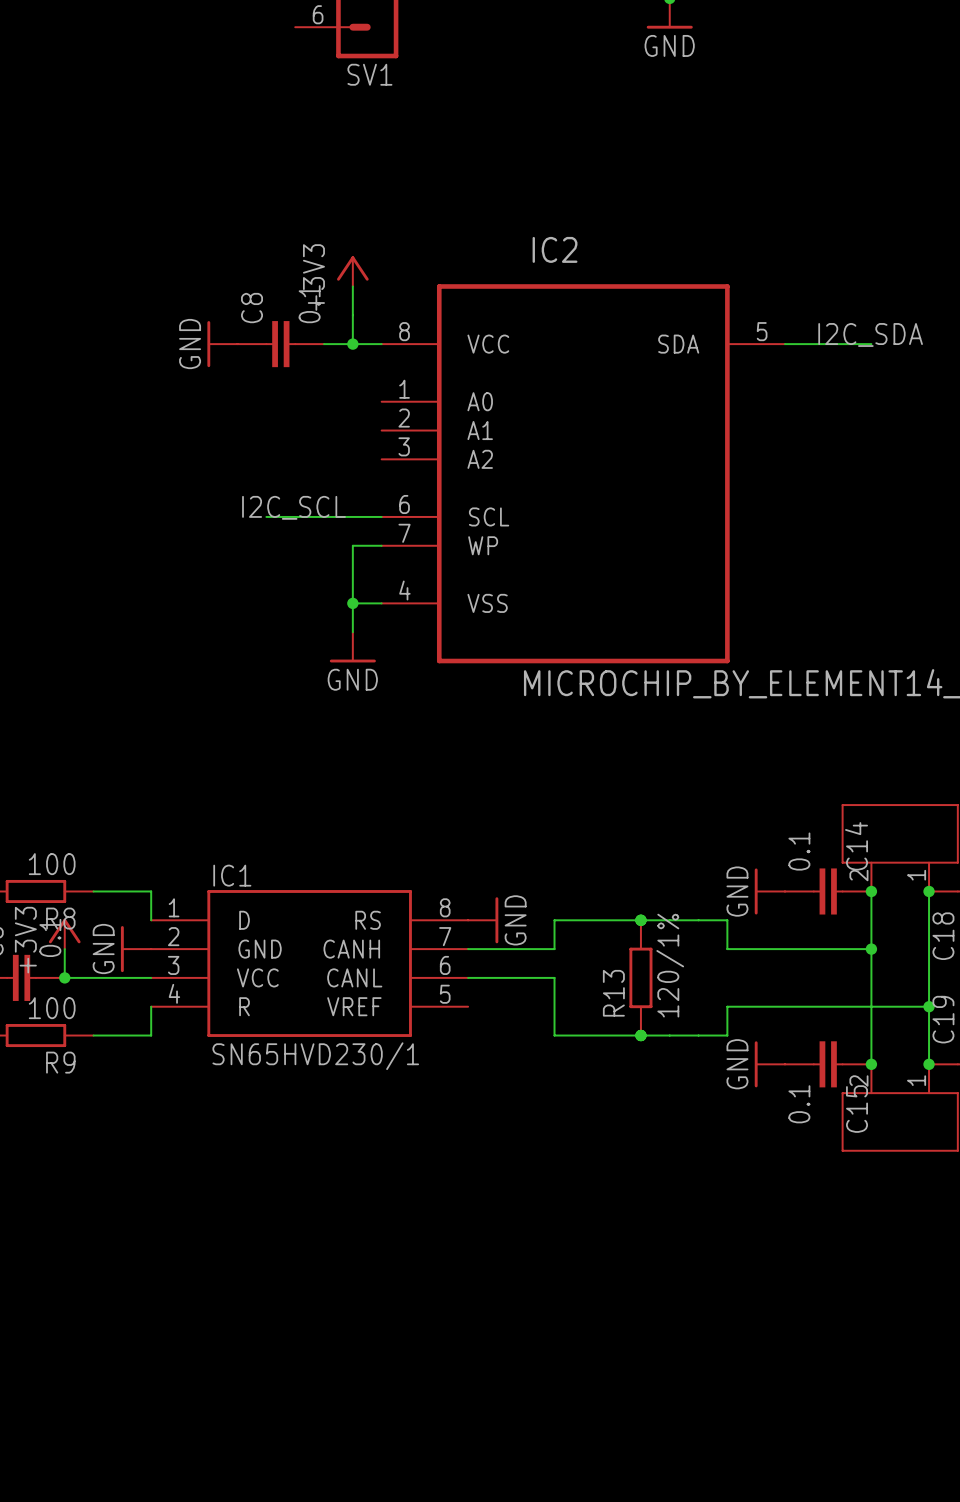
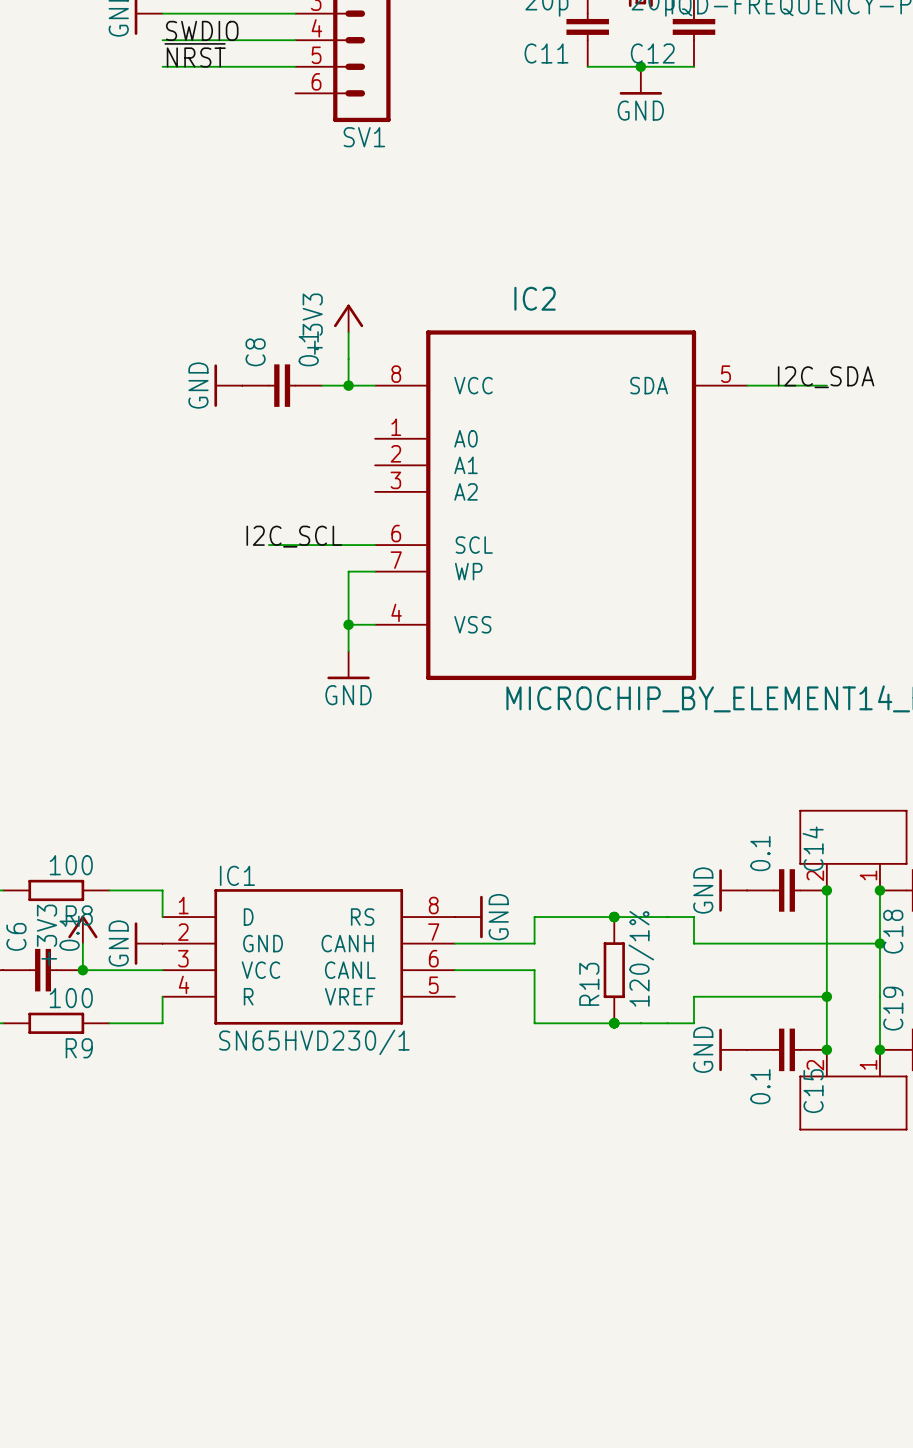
junction: (871, 949) -> none
junction: none -> (879, 943)
wire: (871, 1006) (929, 1006) -> (826, 943) (879, 943)
junction: none -> (826, 996)
junction: (929, 1006) -> none

